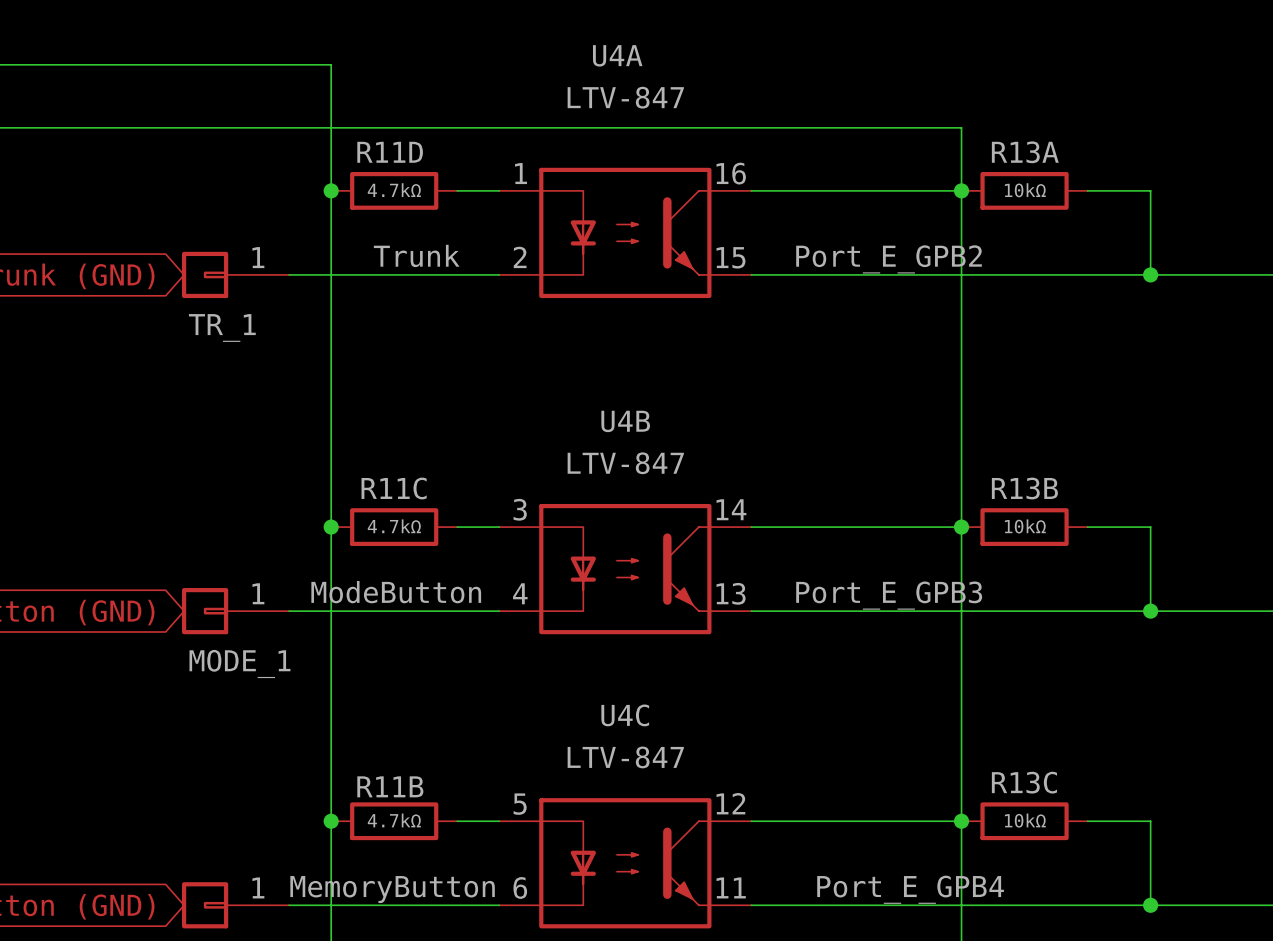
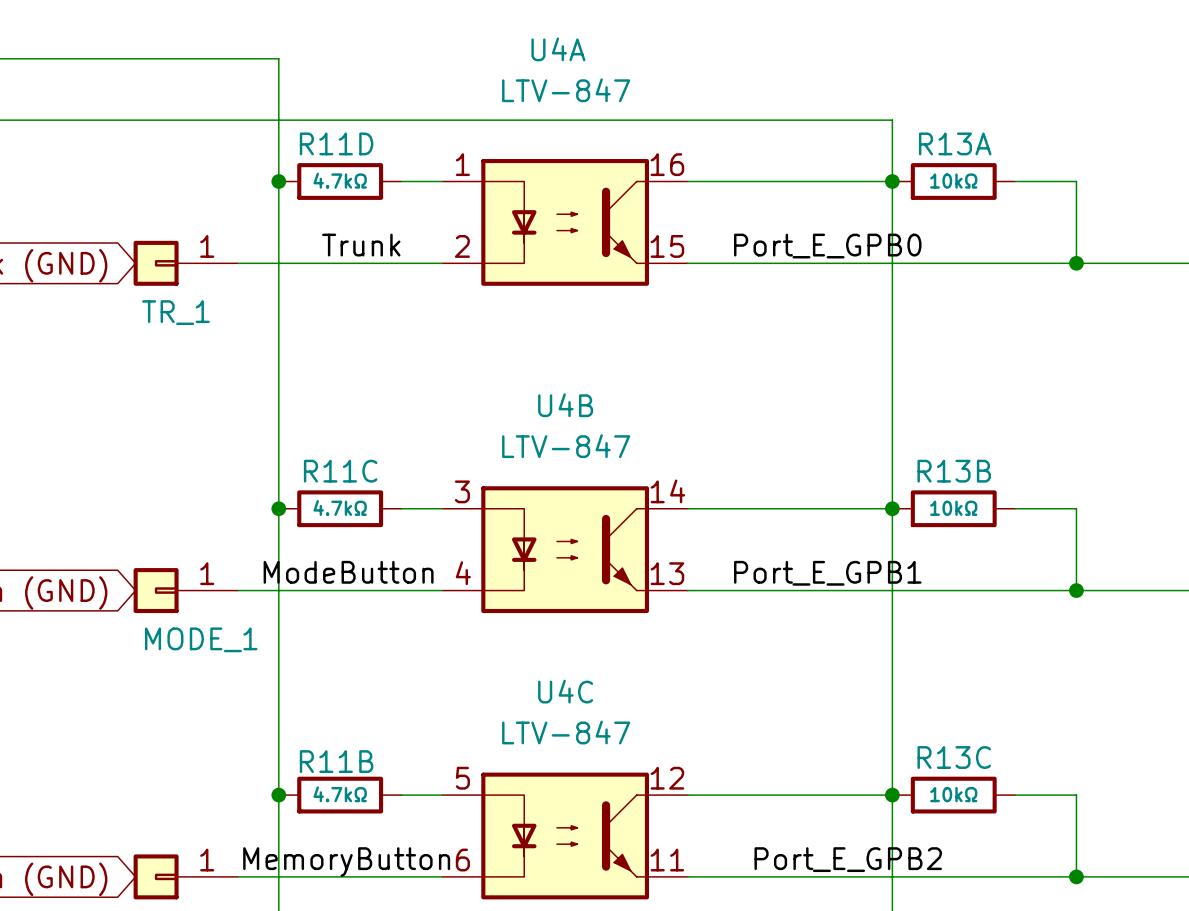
label: Port_E_GPB2 (889, 259) -> Port_E_GPB0 (827, 246)
label: Port_E_GPB3 (889, 595) -> Port_E_GPB1 (827, 573)
label: Port_E_GPB4 (910, 889) -> Port_E_GPB2 (848, 859)

